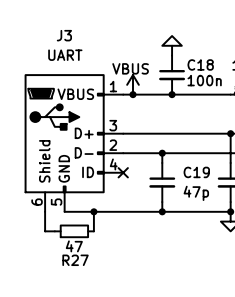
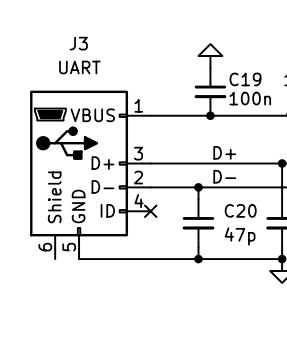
C18 name: C18 (200, 64) -> C19 (245, 79)
power symbol: VBUS (133, 84) -> none
junction: (133, 94) -> none
label: none -> D+ (224, 152)
label: none -> D- (224, 176)
C19 name: C19 (196, 172) -> C20 (240, 210)
wire: (45, 211) (45, 231) (54, 231) -> none
wire: (93, 211) (93, 231) -> none
junction: (93, 211) -> none
R27: 47 (74, 231) -> none

